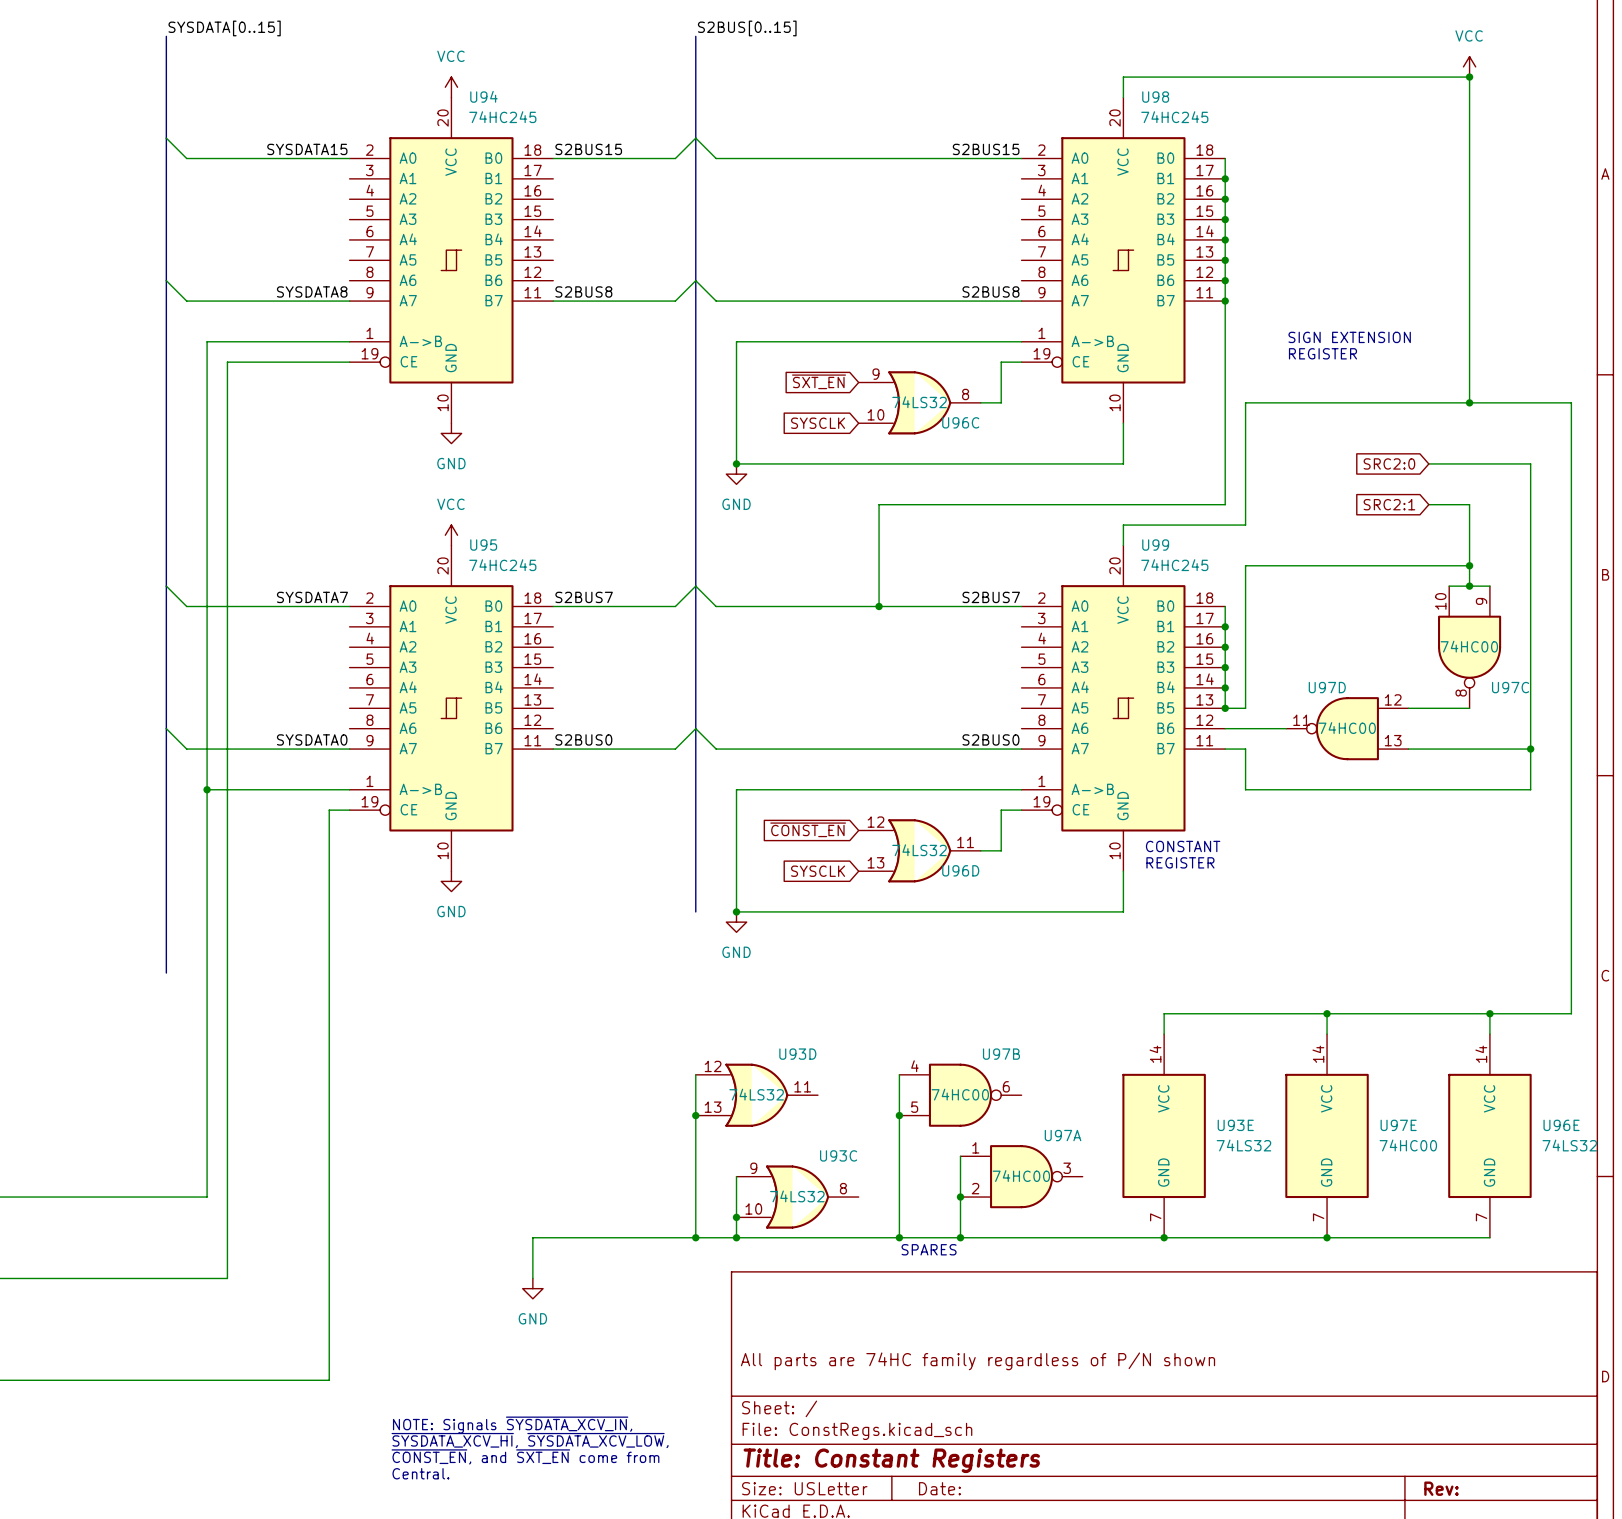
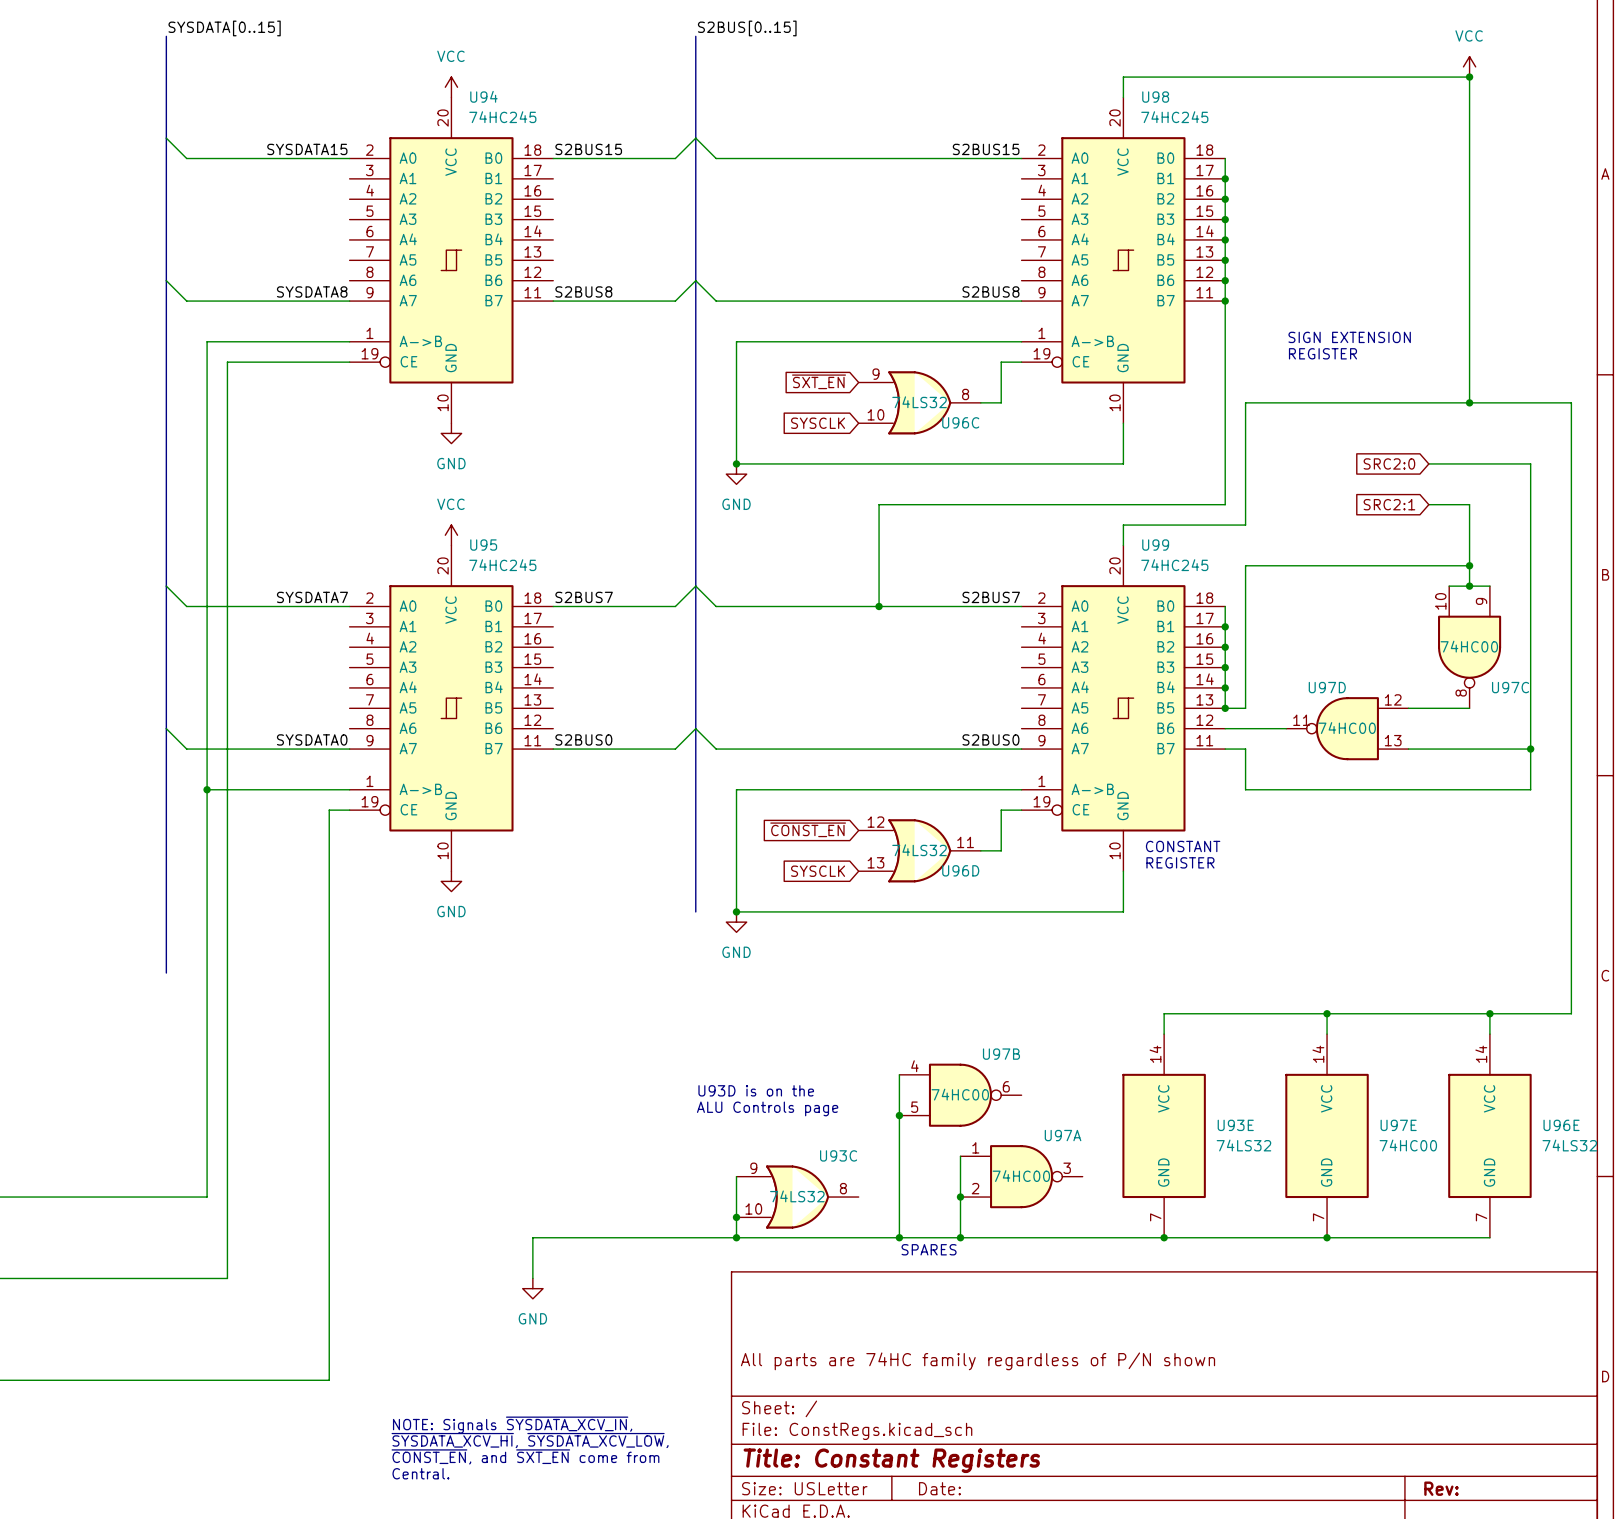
wire: (695, 1074) (695, 1237) -> none
text: none -> U93D is on the (756, 1090)
U93D: 74LS32 (756, 1095) -> none
text: none -> ALU Controls page (767, 1108)
junction: (695, 1115) -> none
junction: (695, 1237) -> none

